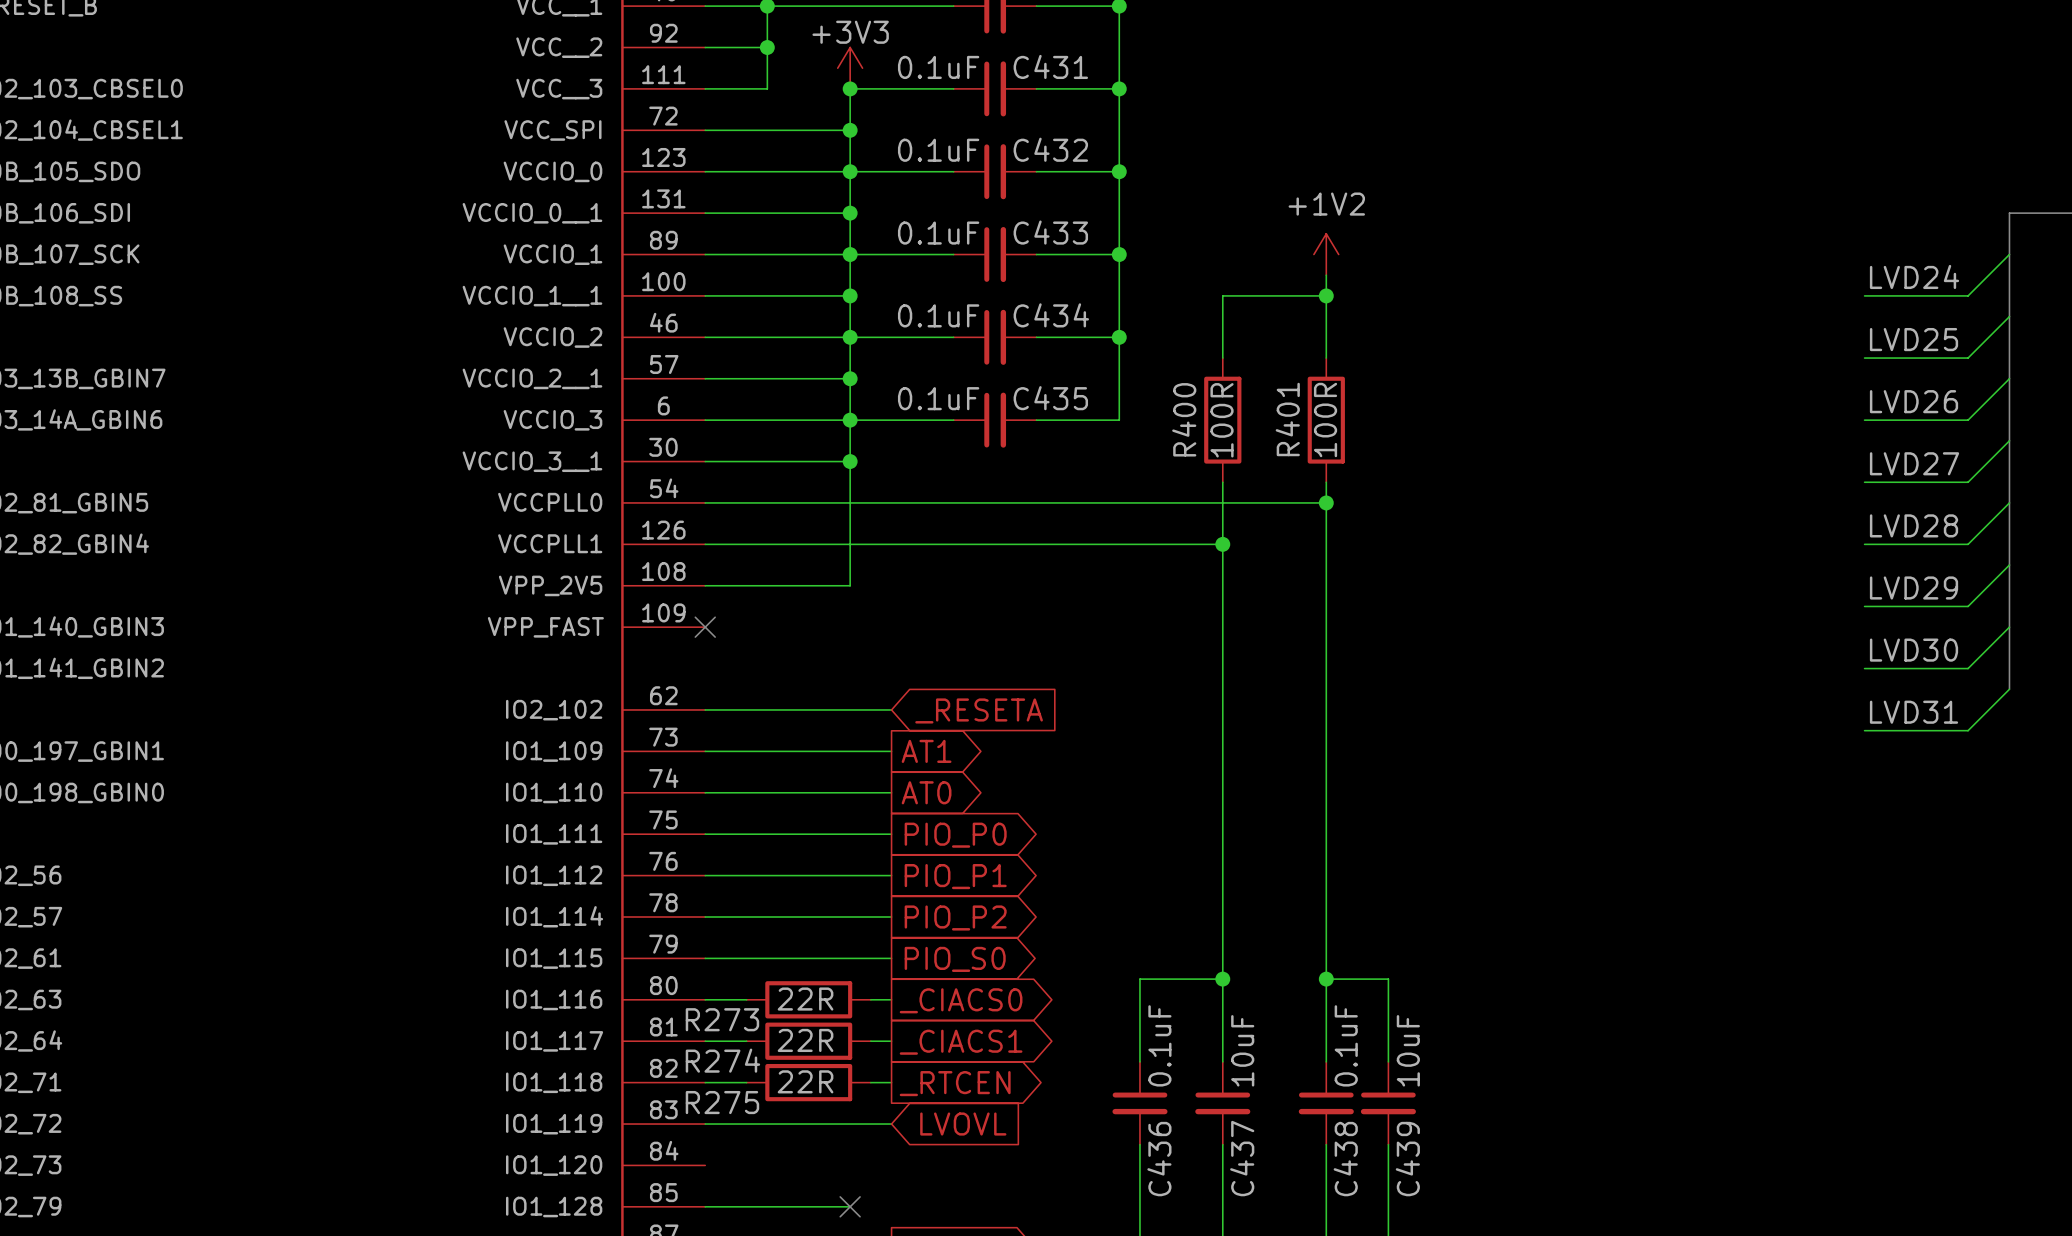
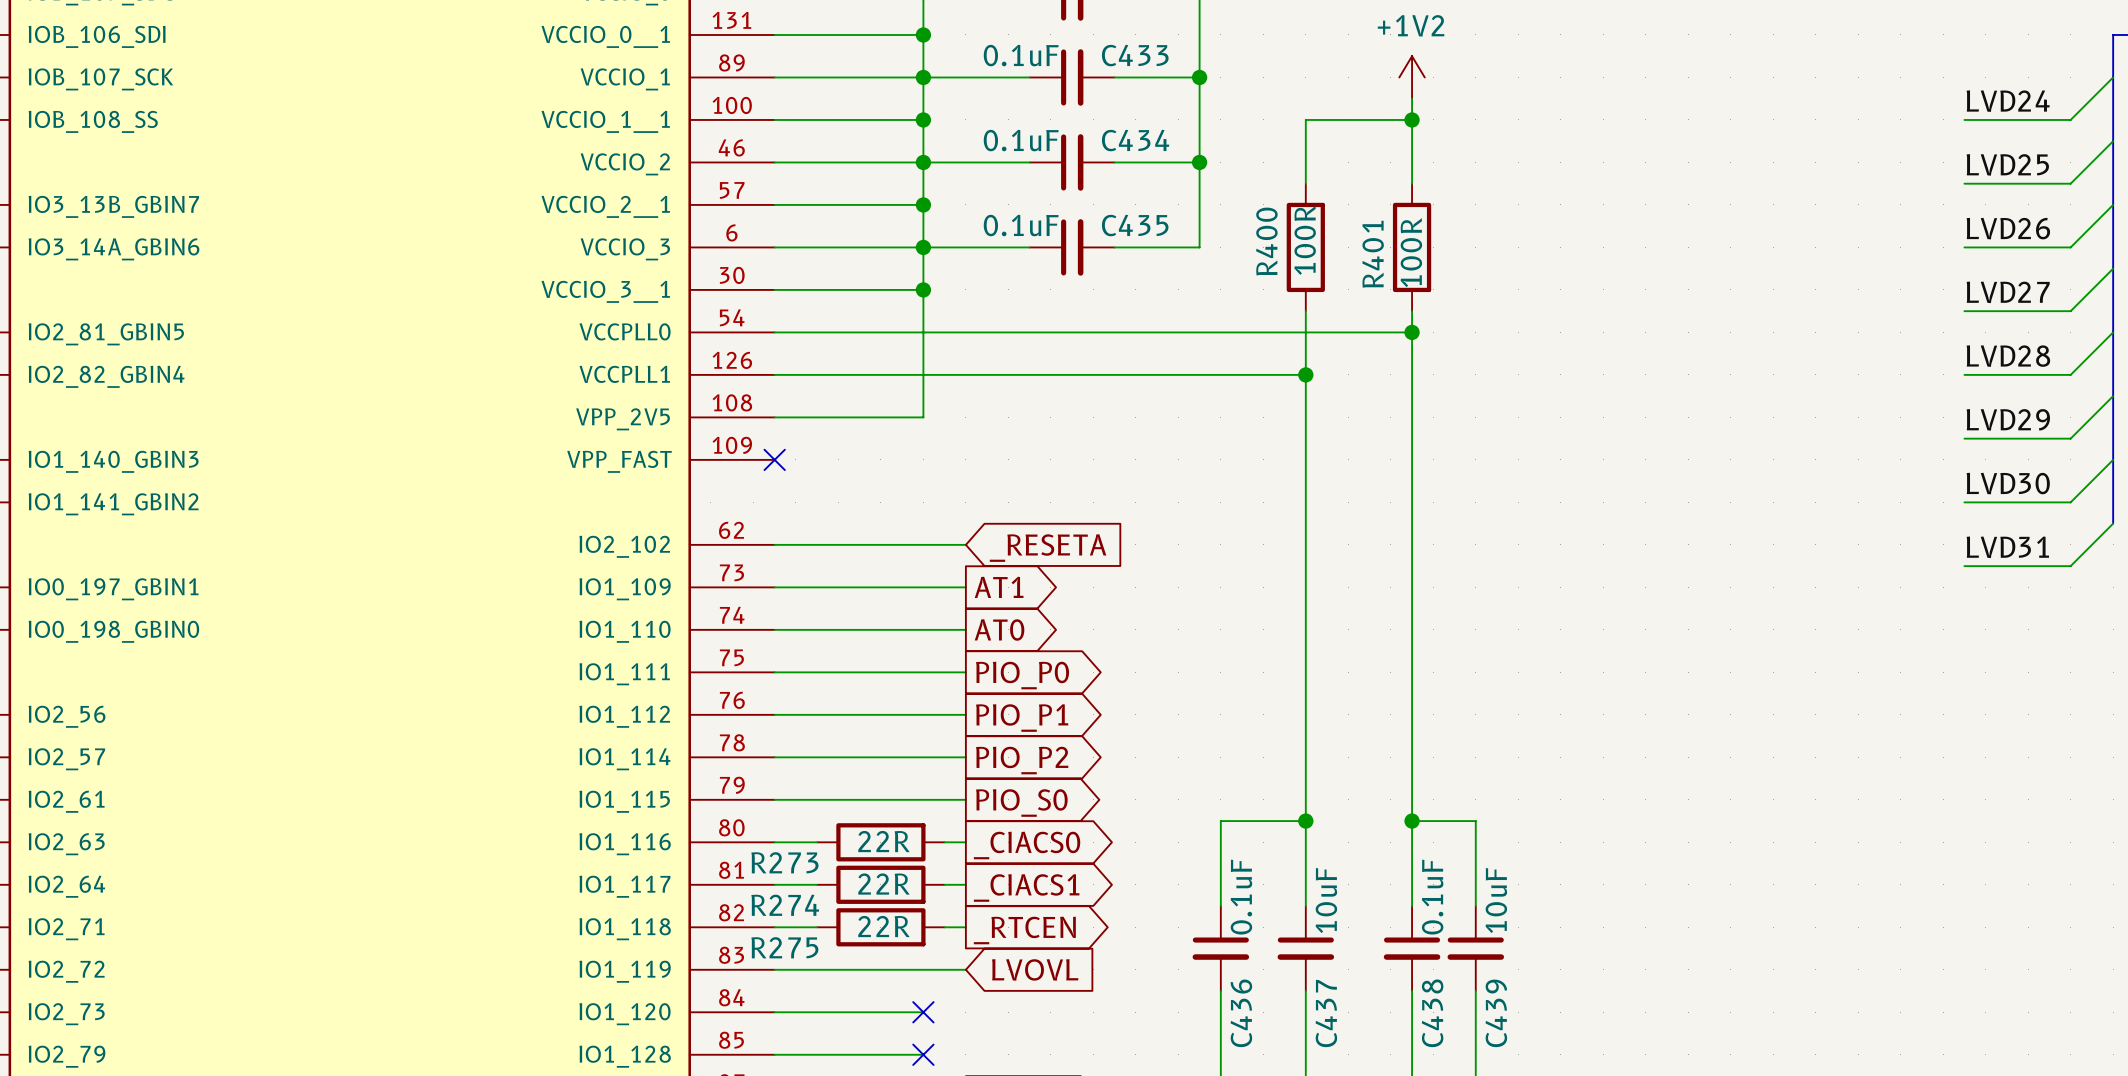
wire: none -> (774, 1012) (923, 1012)
no-connect mark: none -> (923, 1012)

